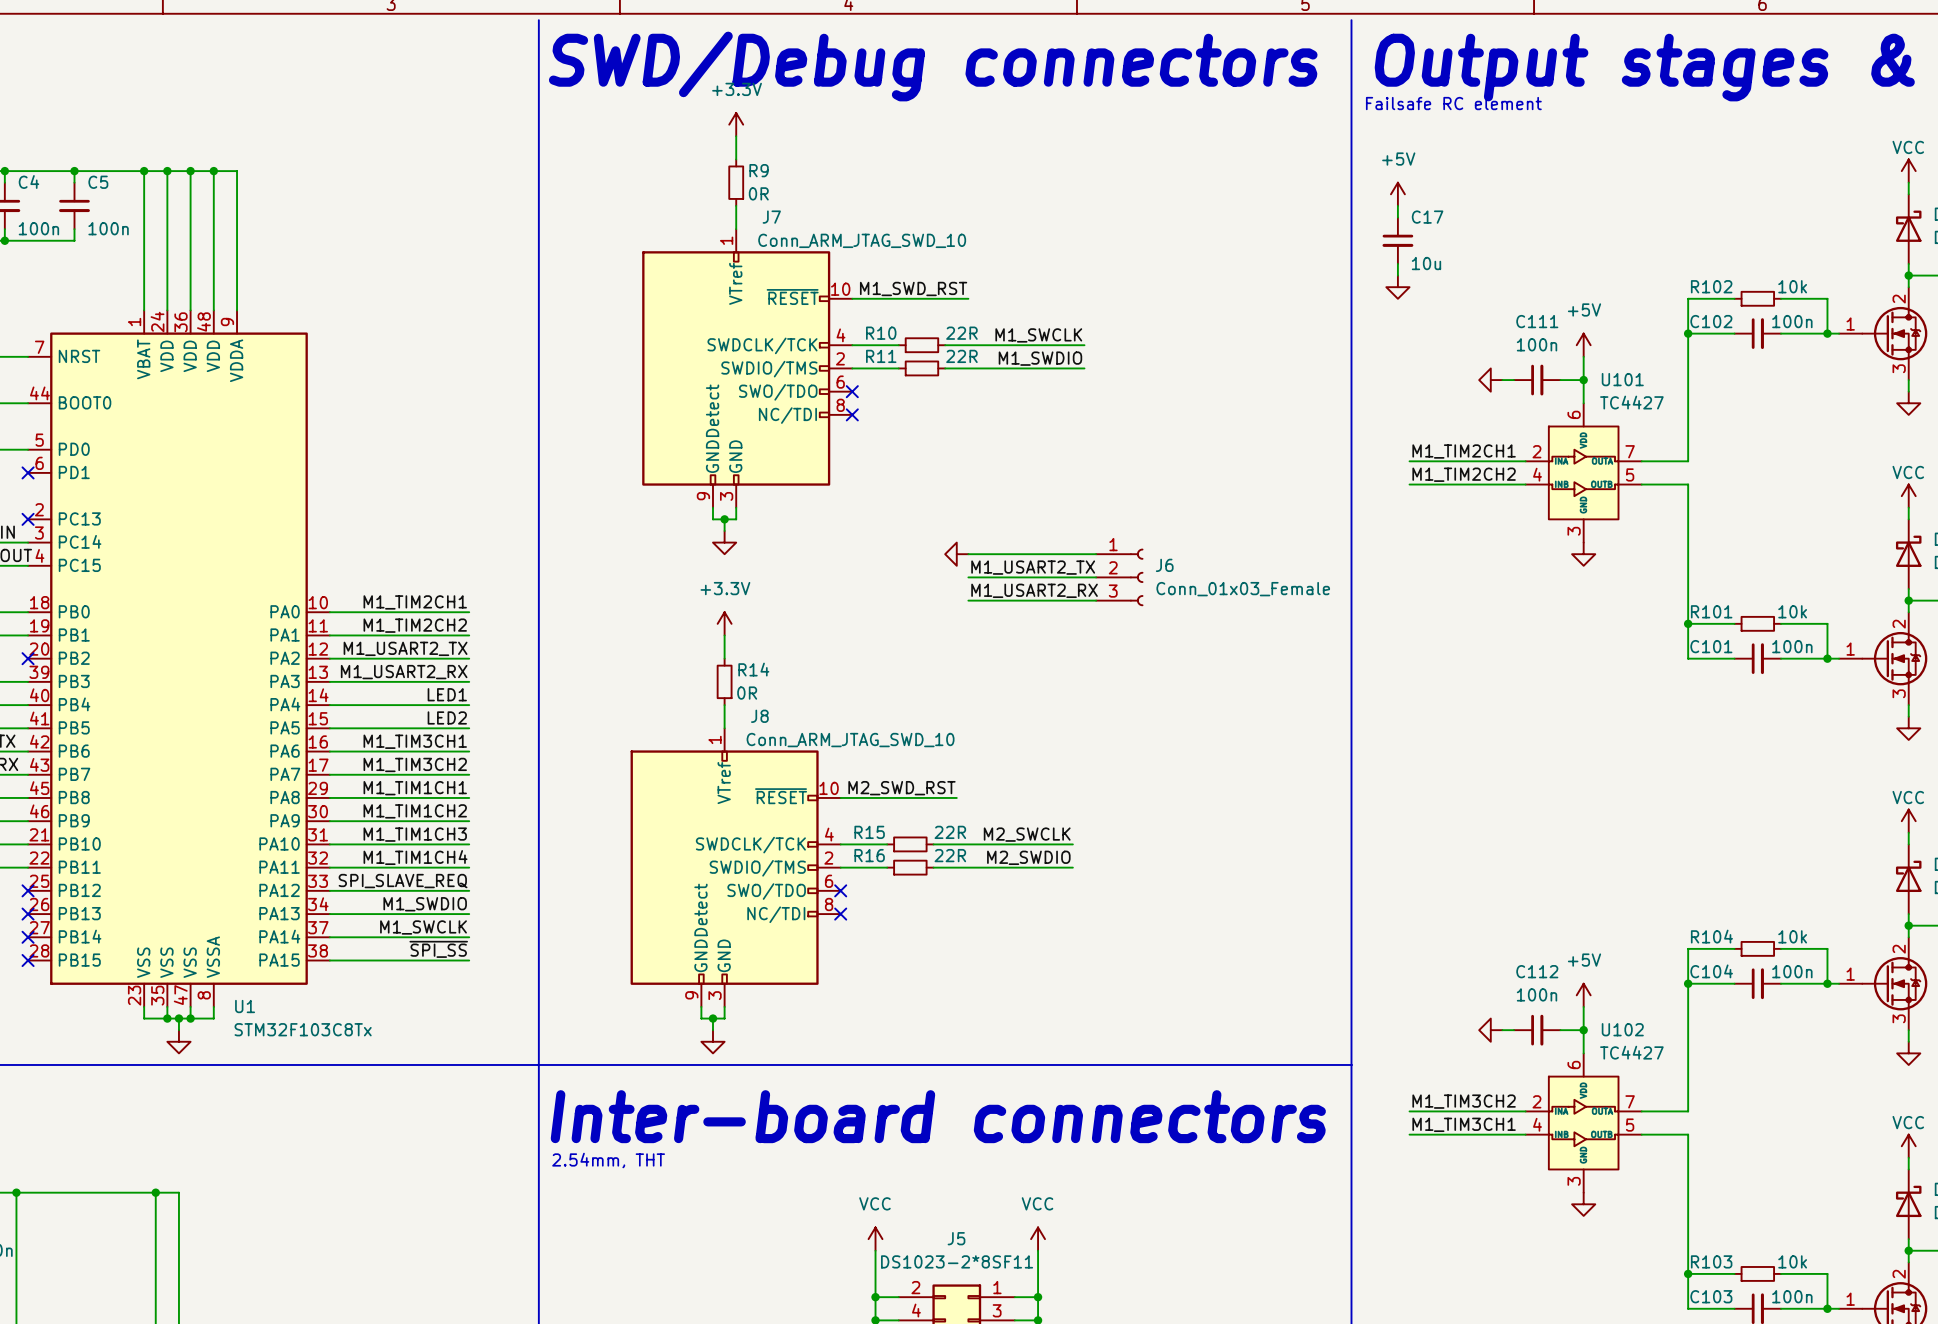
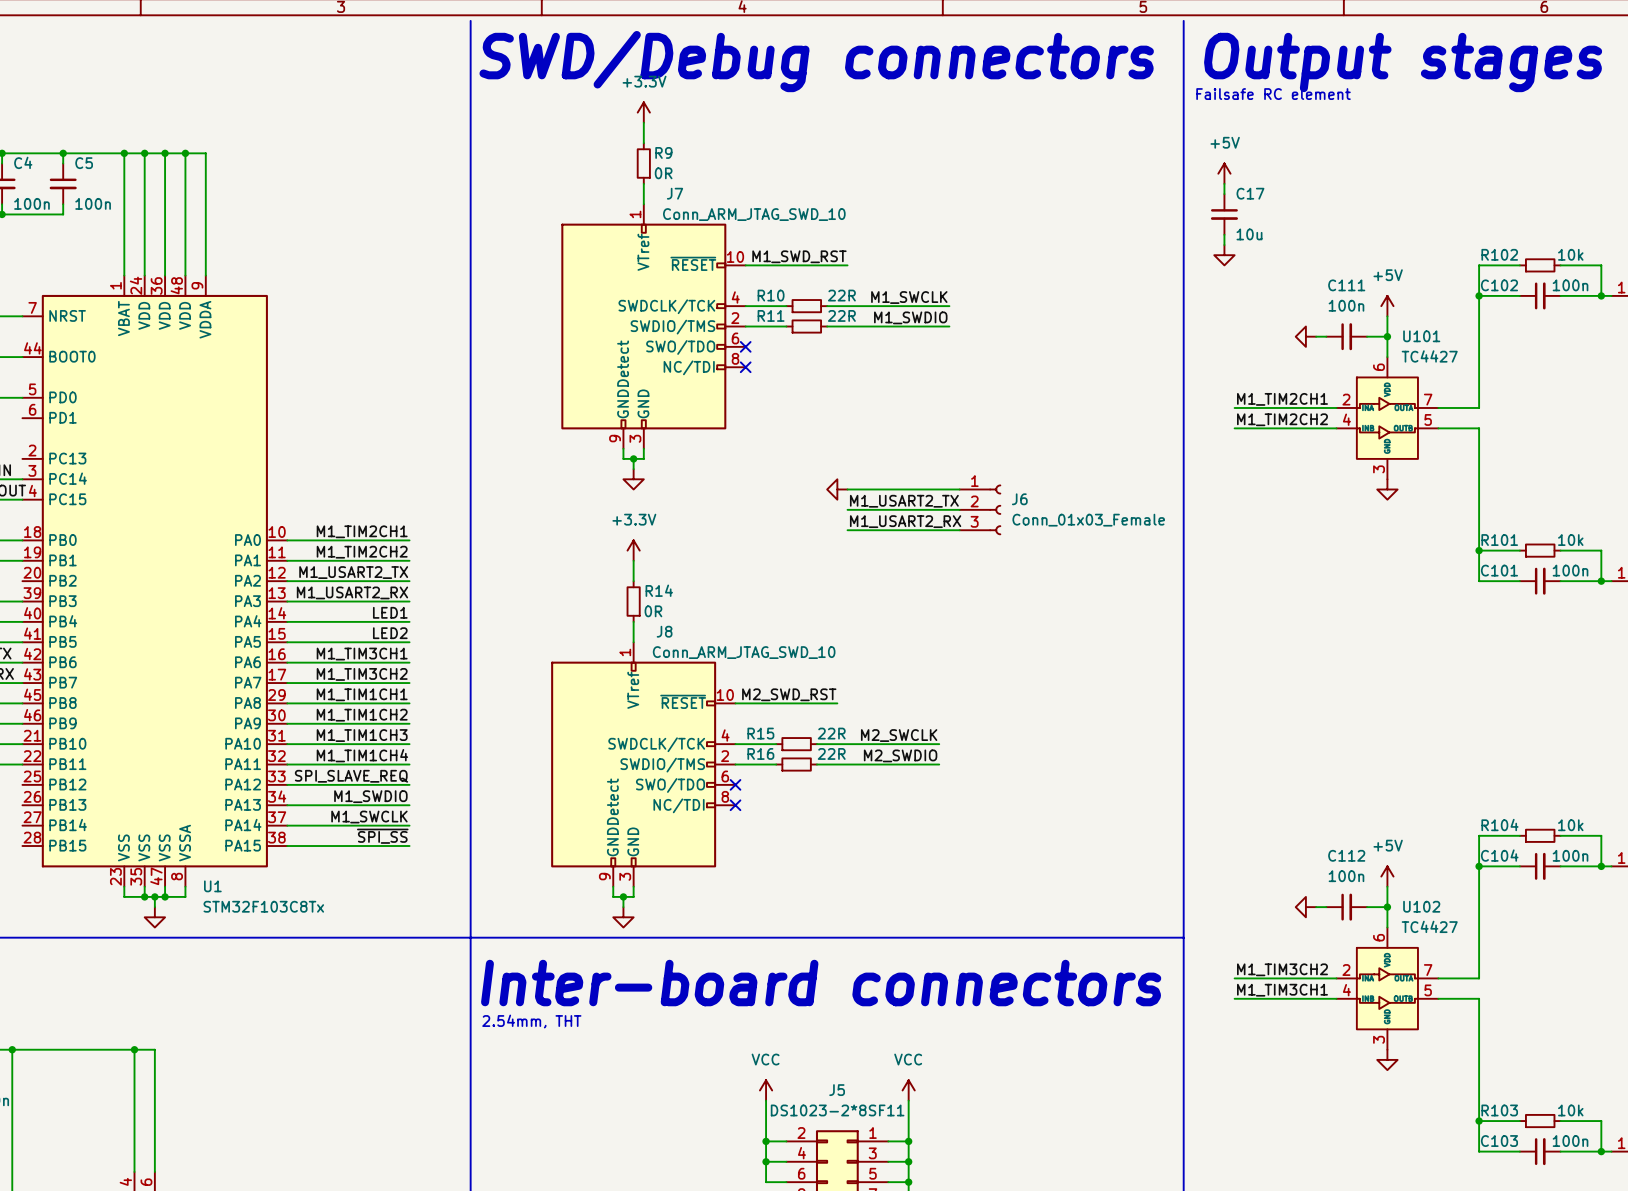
no-connect mark: (28, 472) -> none
no-connect mark: (28, 519) -> none
no-connect mark: (28, 658) -> none
no-connect mark: (28, 890) -> none
no-connect mark: (28, 914) -> none
no-connect mark: (28, 937) -> none
no-connect mark: (28, 960) -> none

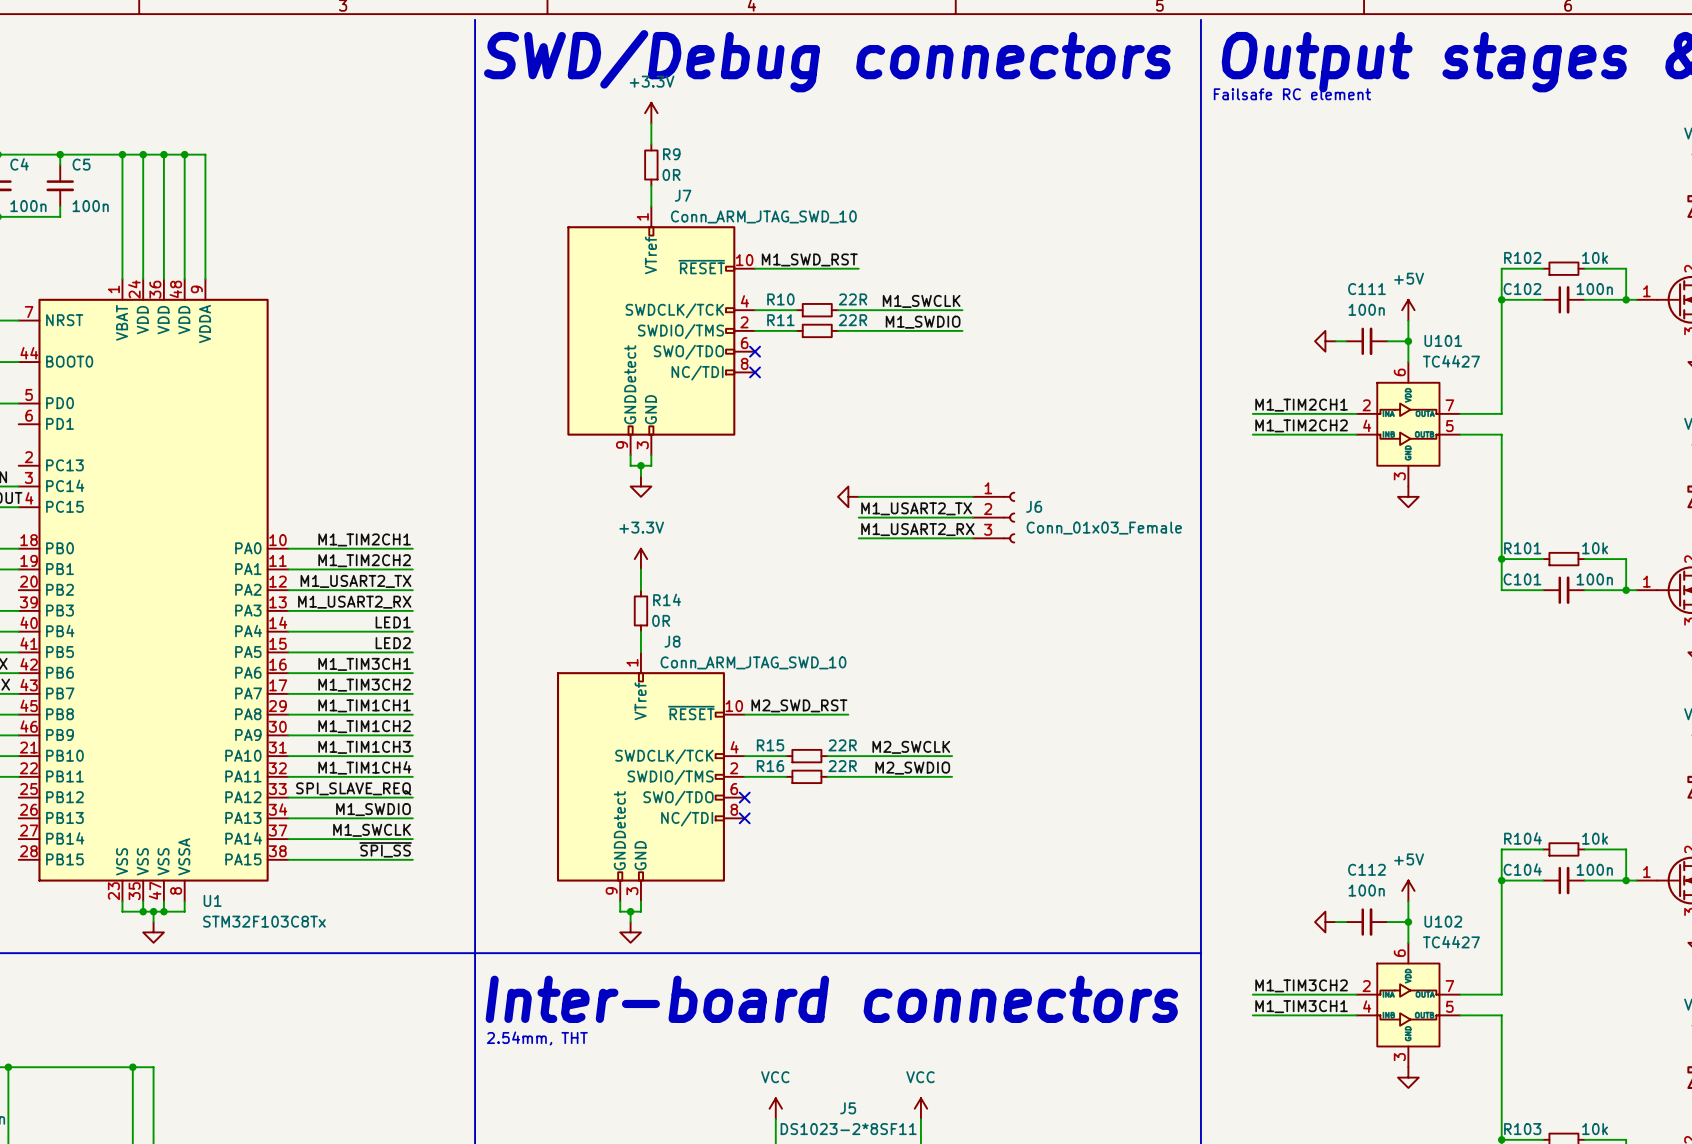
power symbol: +5V (1224, 173) -> none
wire: (1224, 183) (1224, 194) -> none
C17: 10u (1224, 214) -> none
wire: (1224, 234) (1224, 245) -> none
power symbol: (1224, 255) -> none

